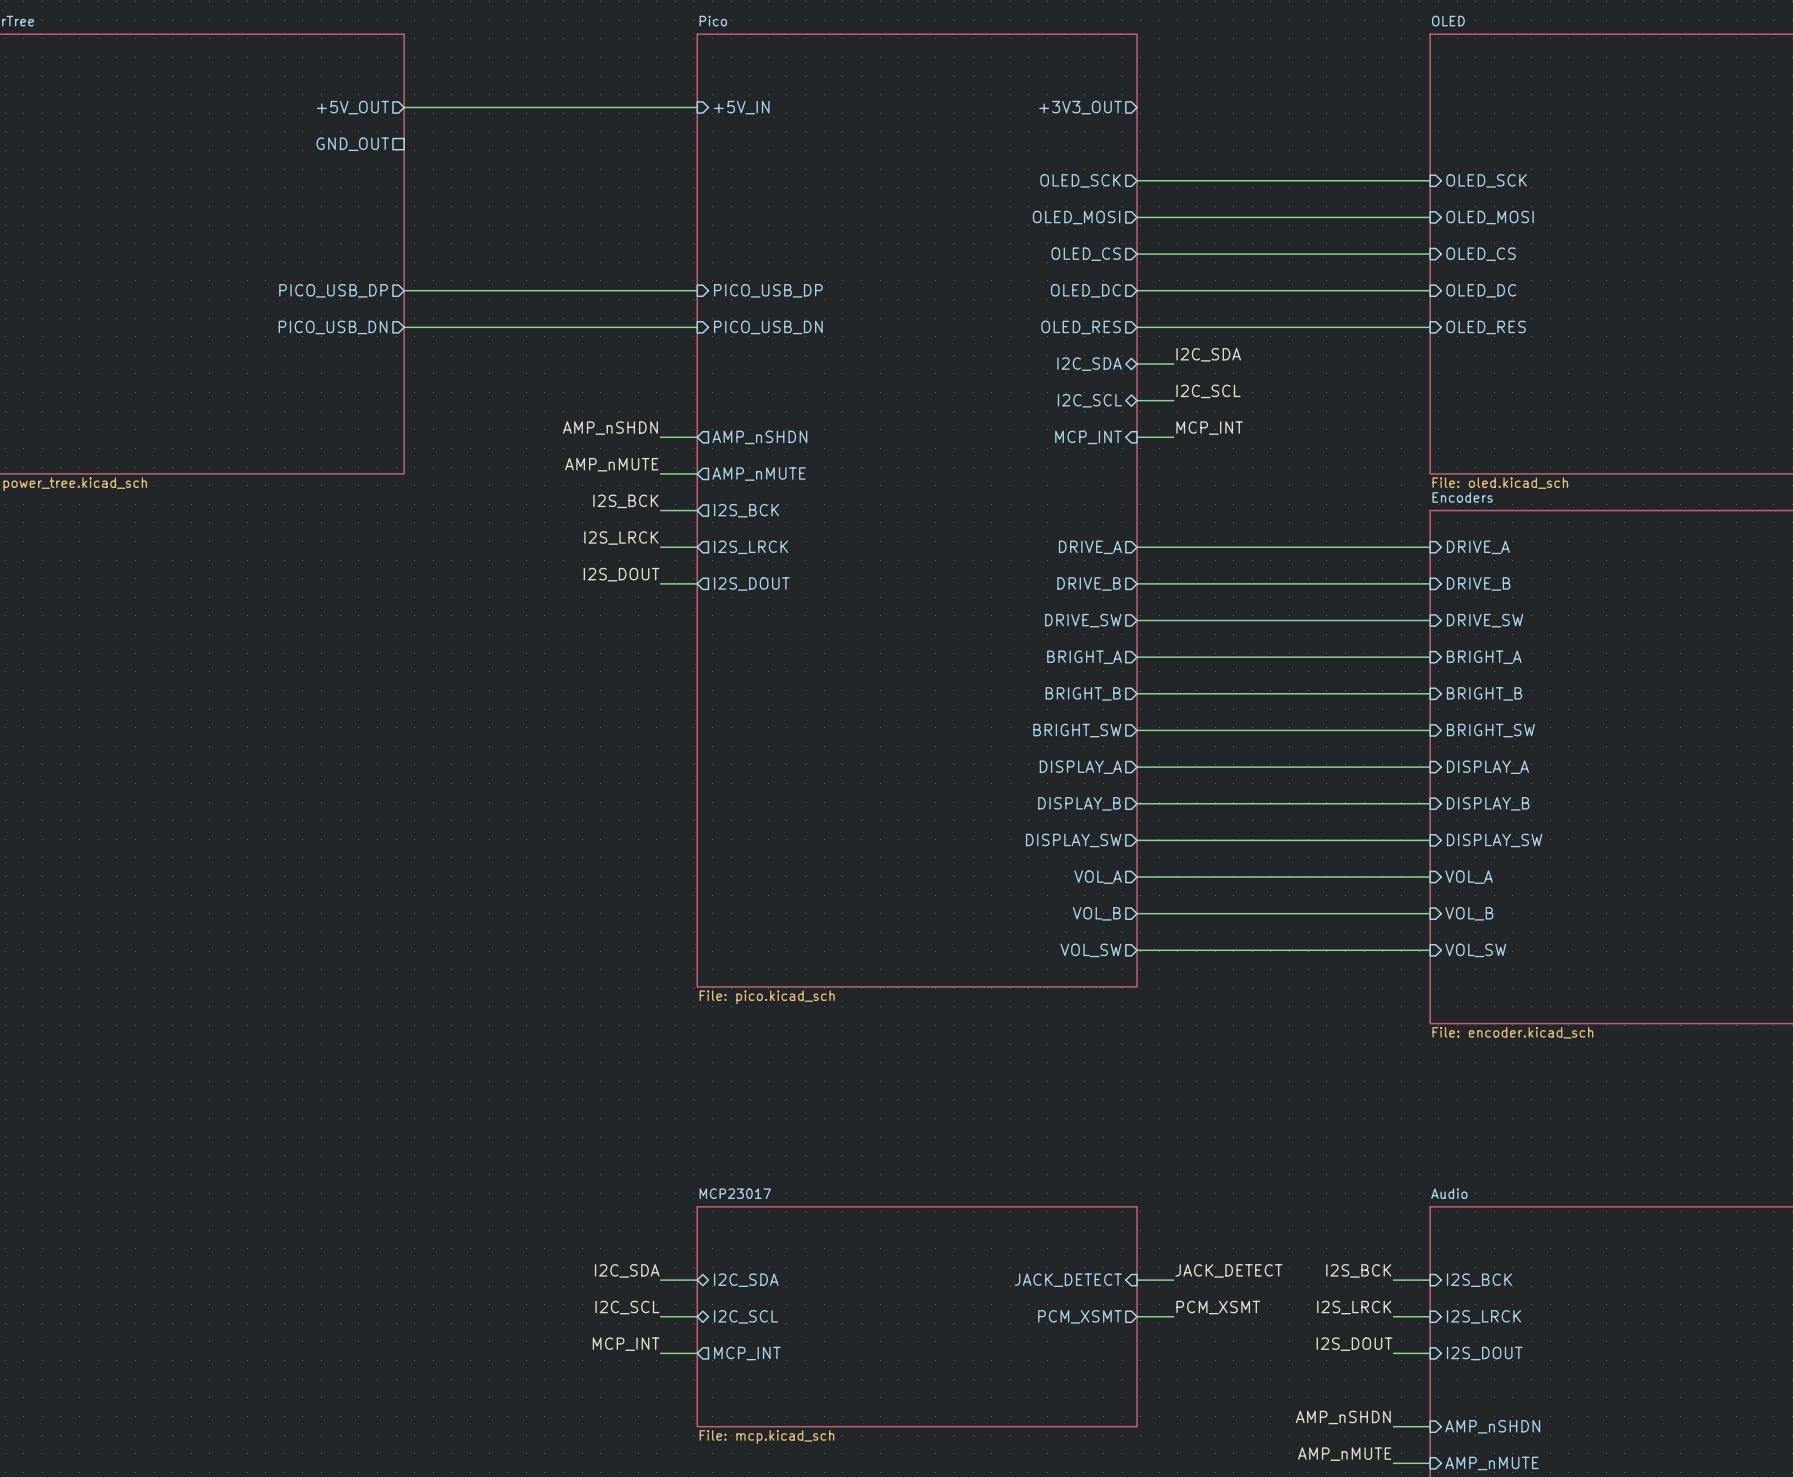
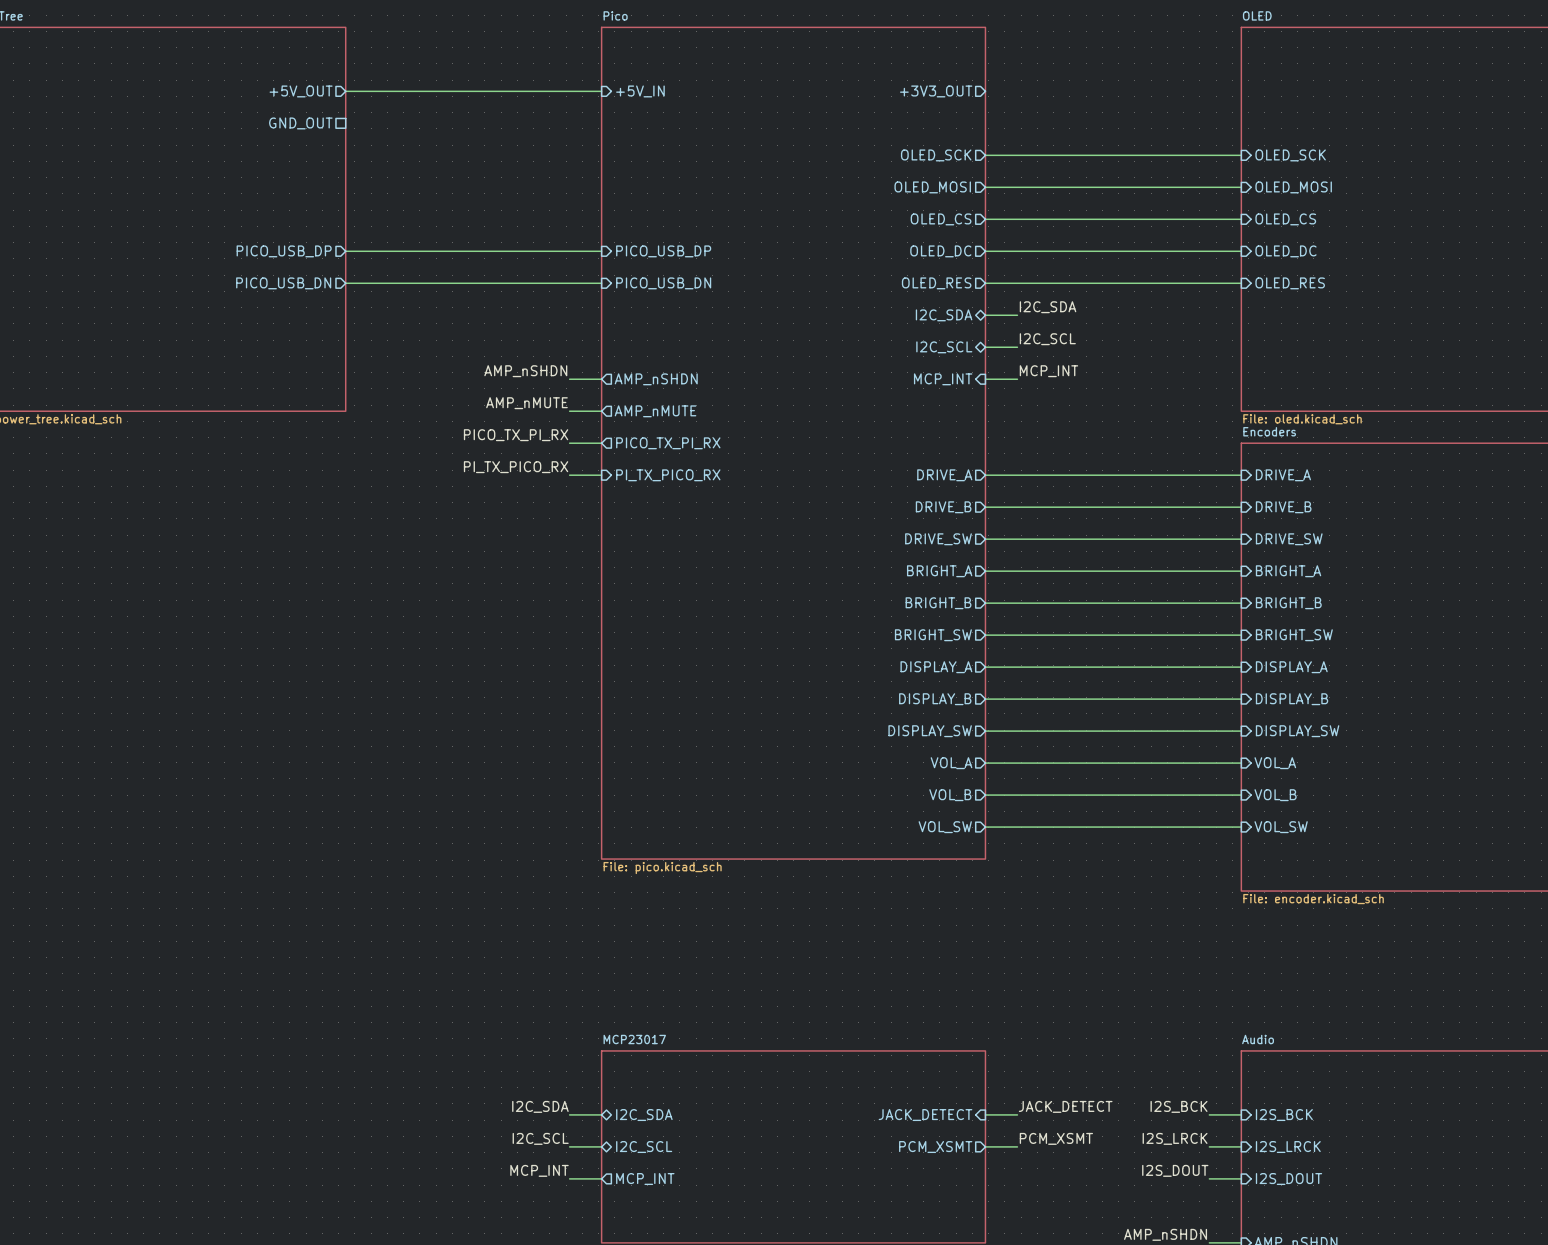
label: I2S_BCK (625, 501) -> PICO_TX_PI_RX (516, 435)
sheet pin: I2S_BCK (746, 510) -> PICO_TX_PI_RX (668, 443)
label: I2S_LRCK (621, 538) -> PI_TX_PICO_RX (516, 467)
sheet pin shape: output (751, 547) -> input (668, 475)
sheet pin: I2S_LRCK (751, 547) -> PI_TX_PICO_RX (668, 475)
label: I2S_DOUT (621, 574) -> none
wire: (660, 583) (697, 583) -> none
sheet pin: I2S_DOUT (751, 583) -> none

